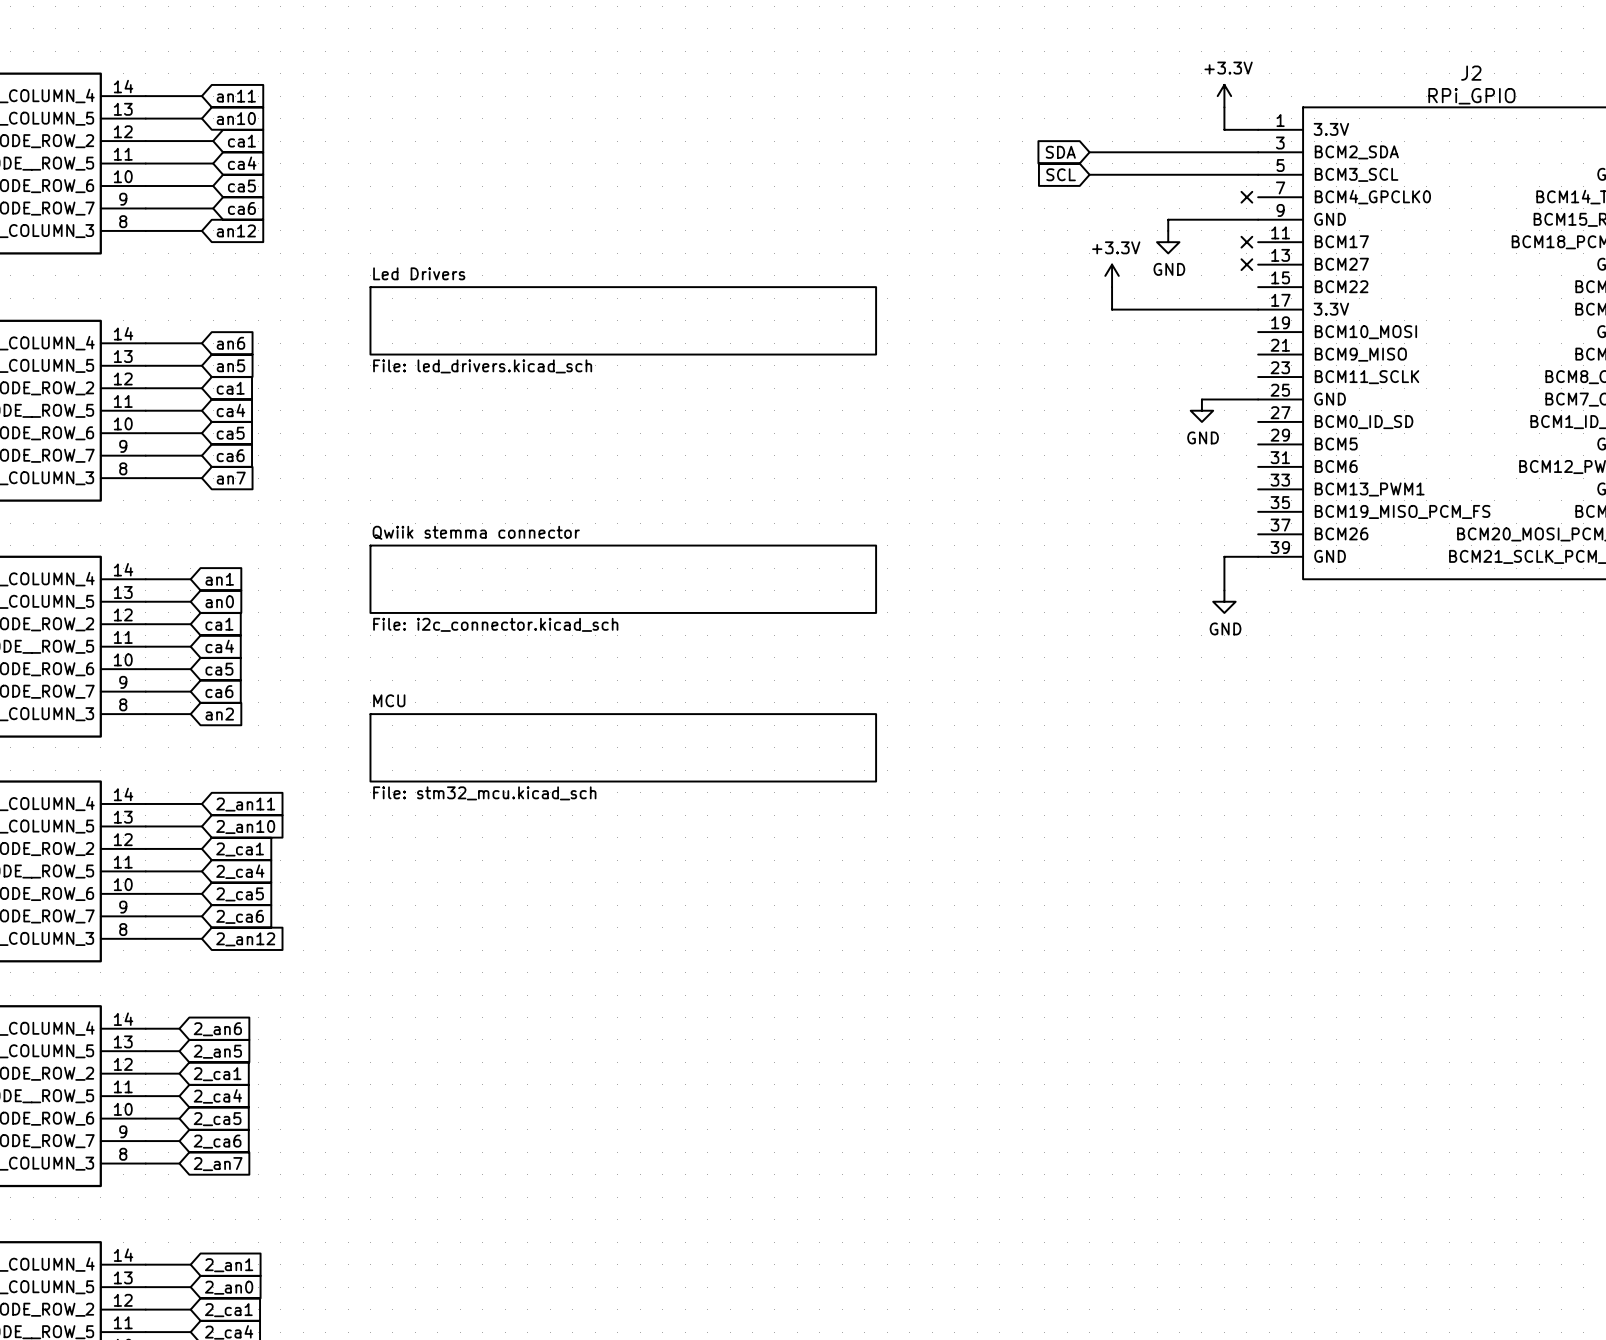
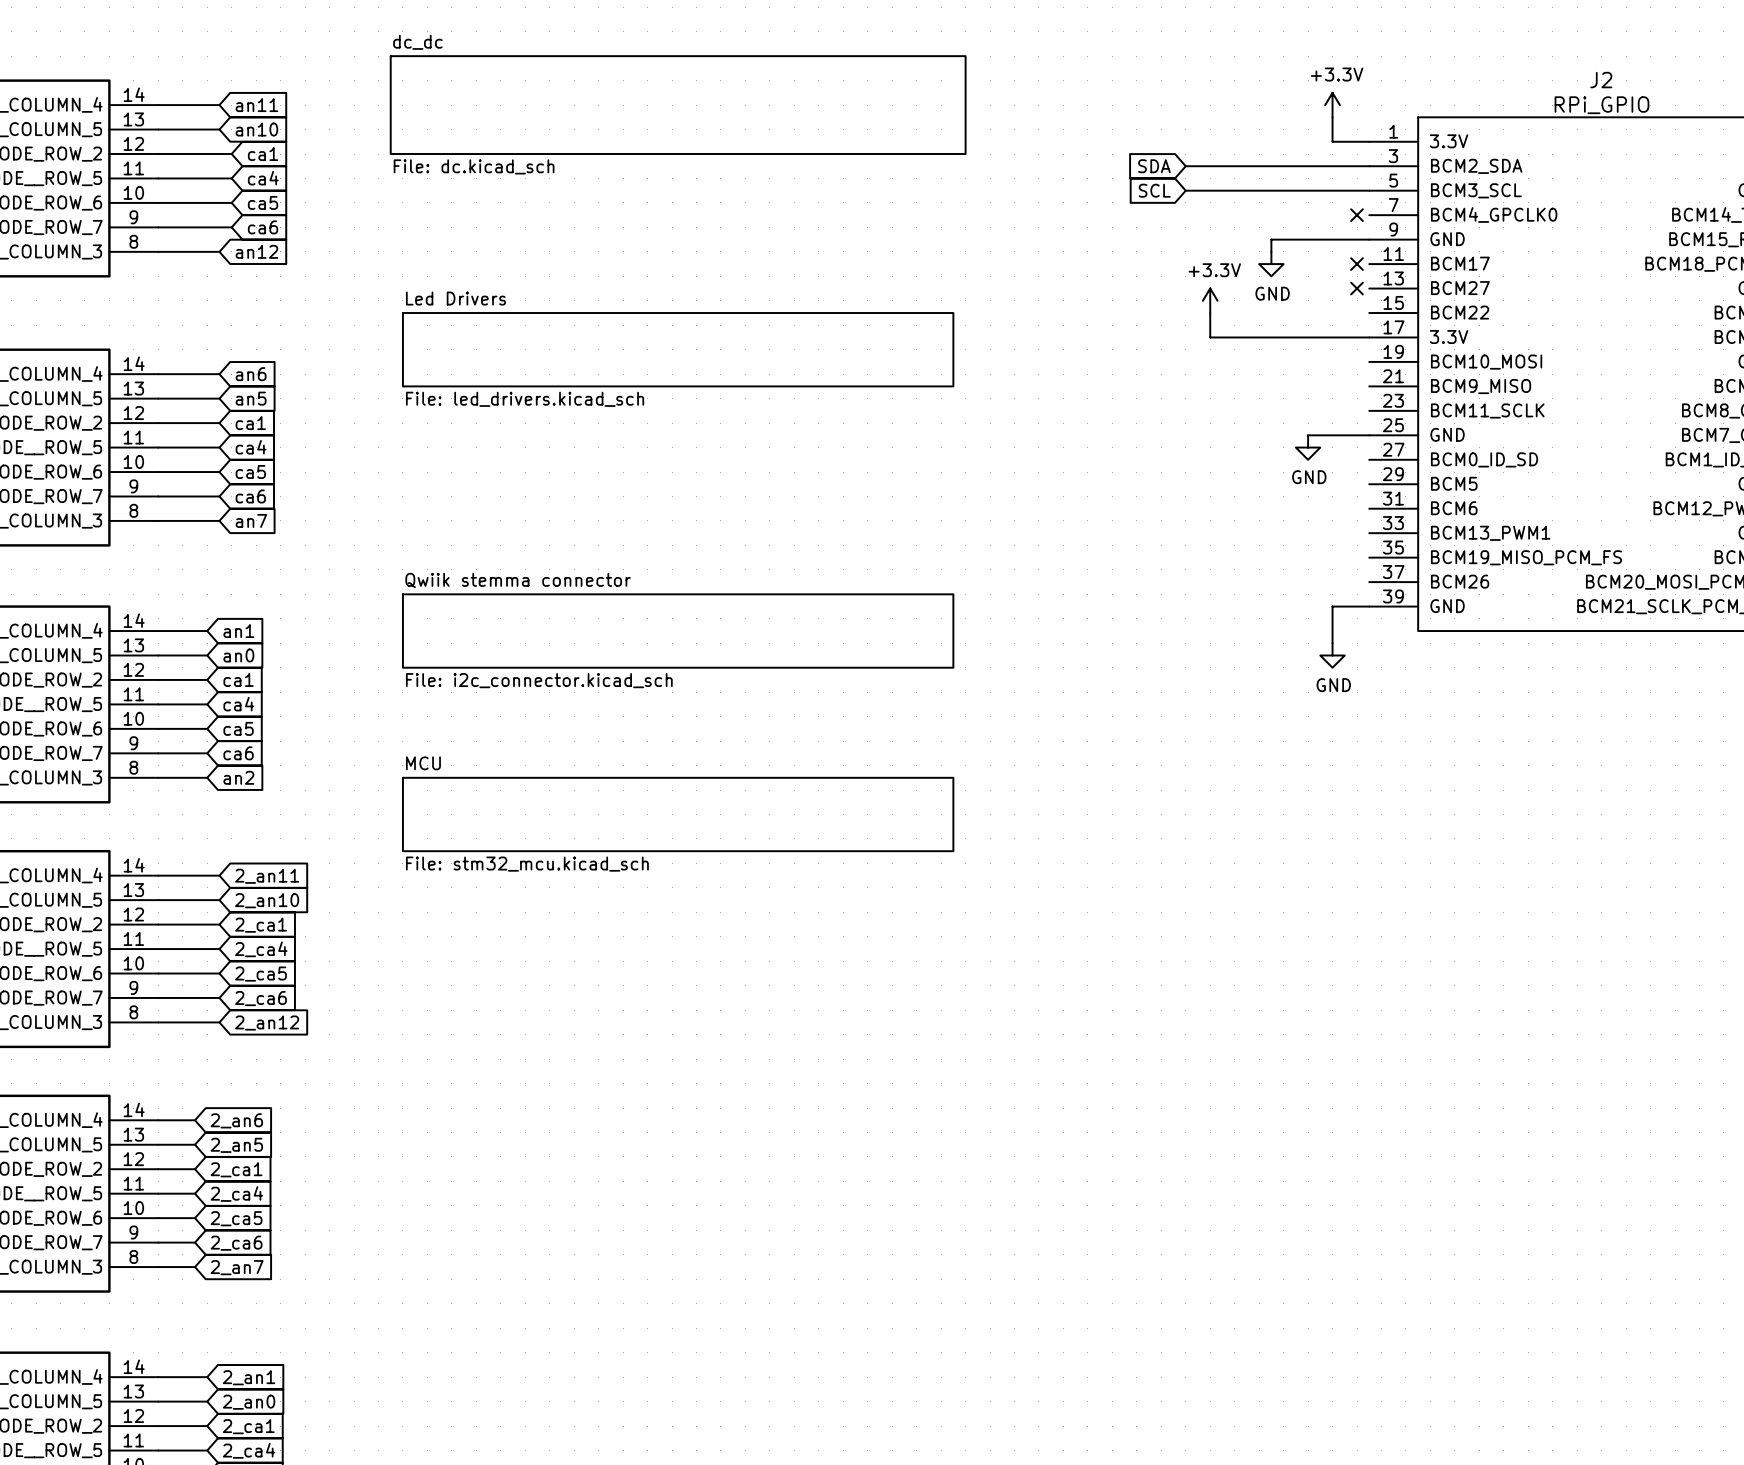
sheet dc_dc: none -> File: dc.kicad_sch (678, 105)

